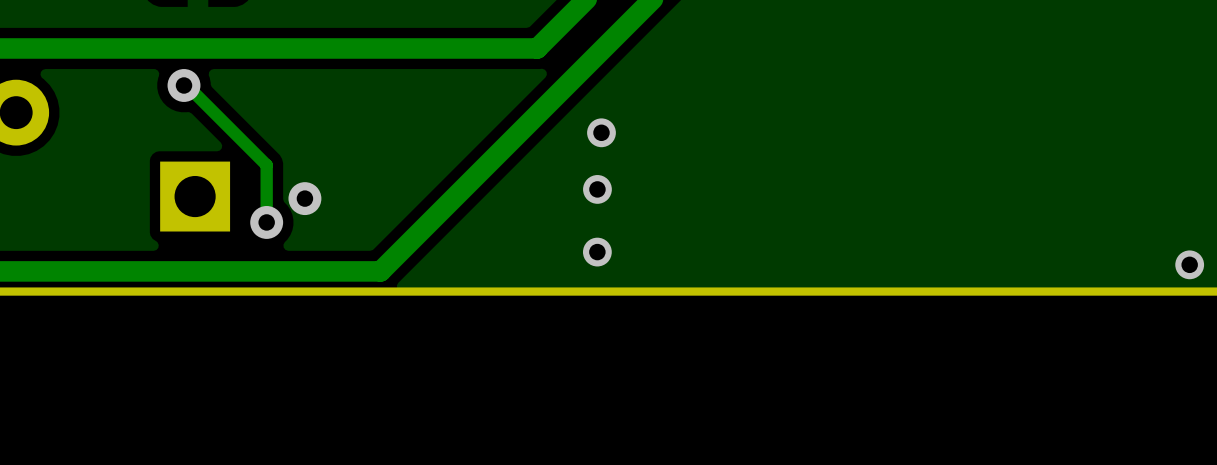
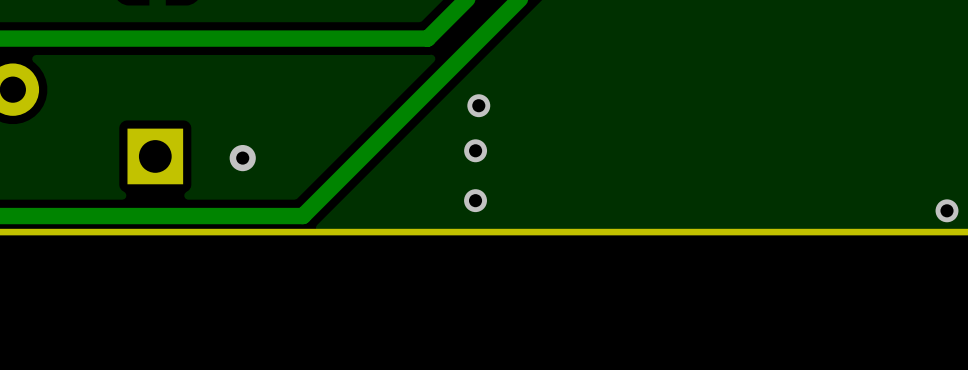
track: (184, 85) (186, 85) (266, 165) (266, 222) -> none
via: (184, 85) -> none
via: (266, 222) -> none

